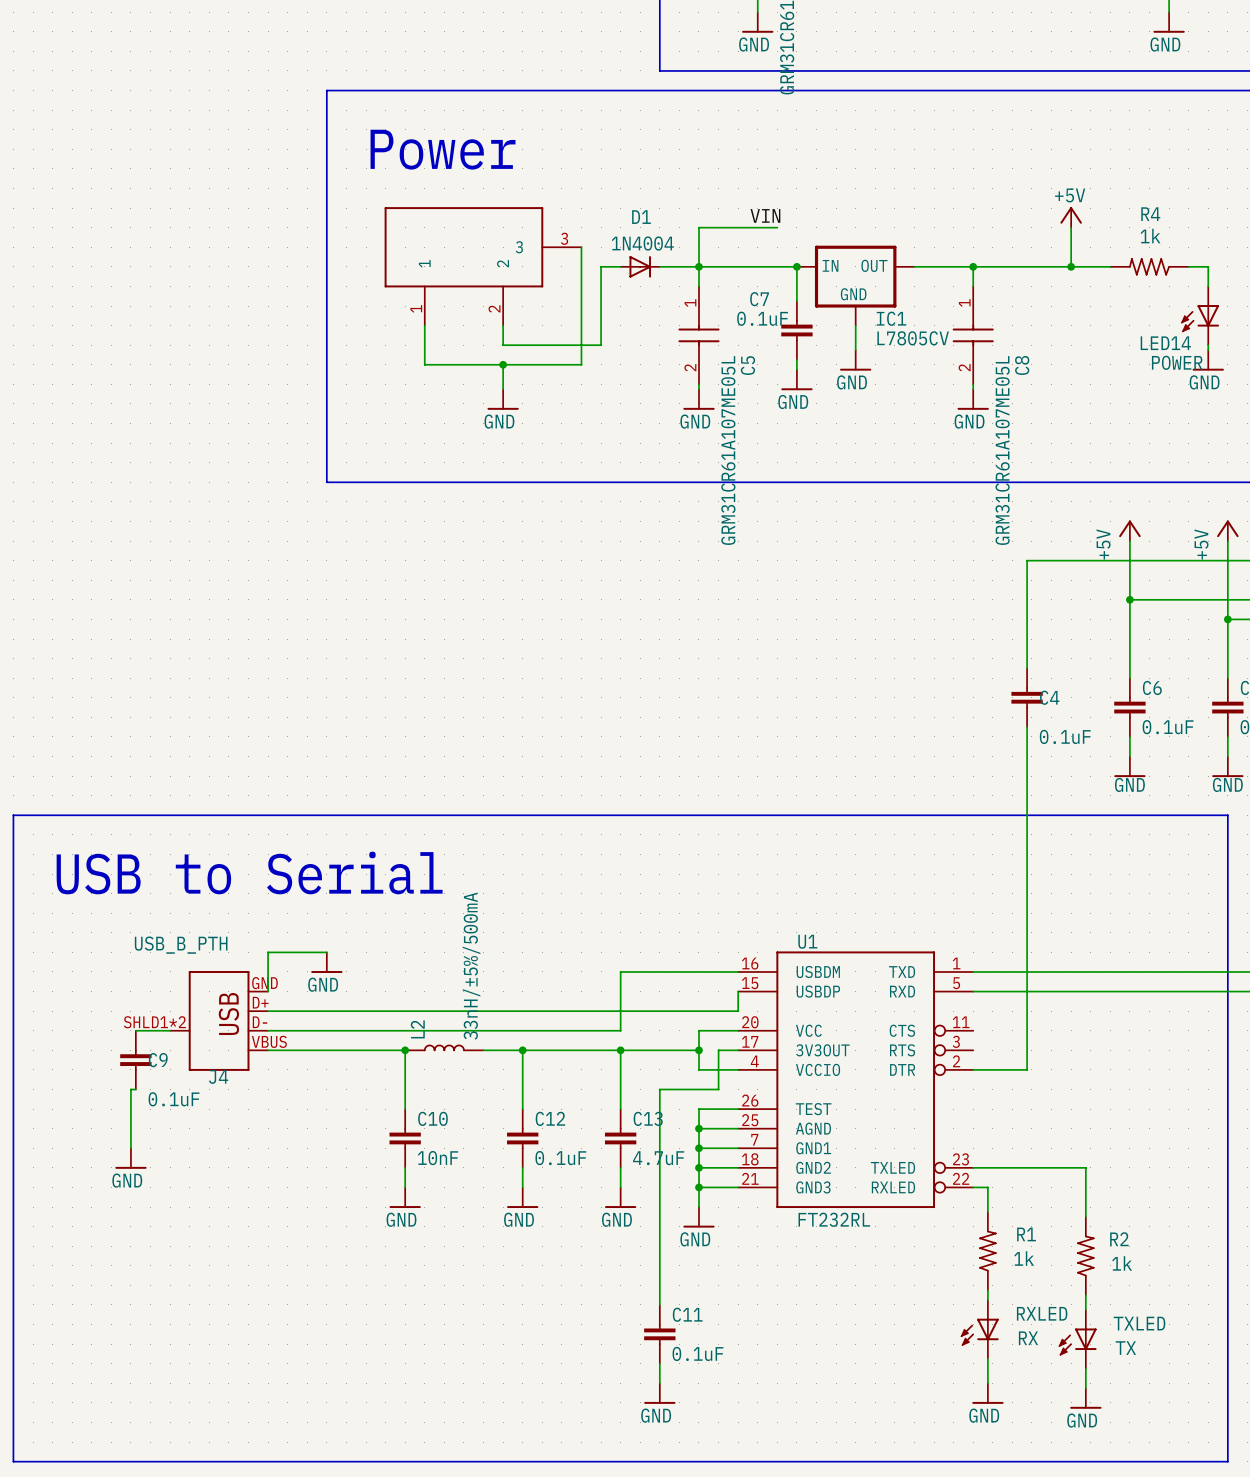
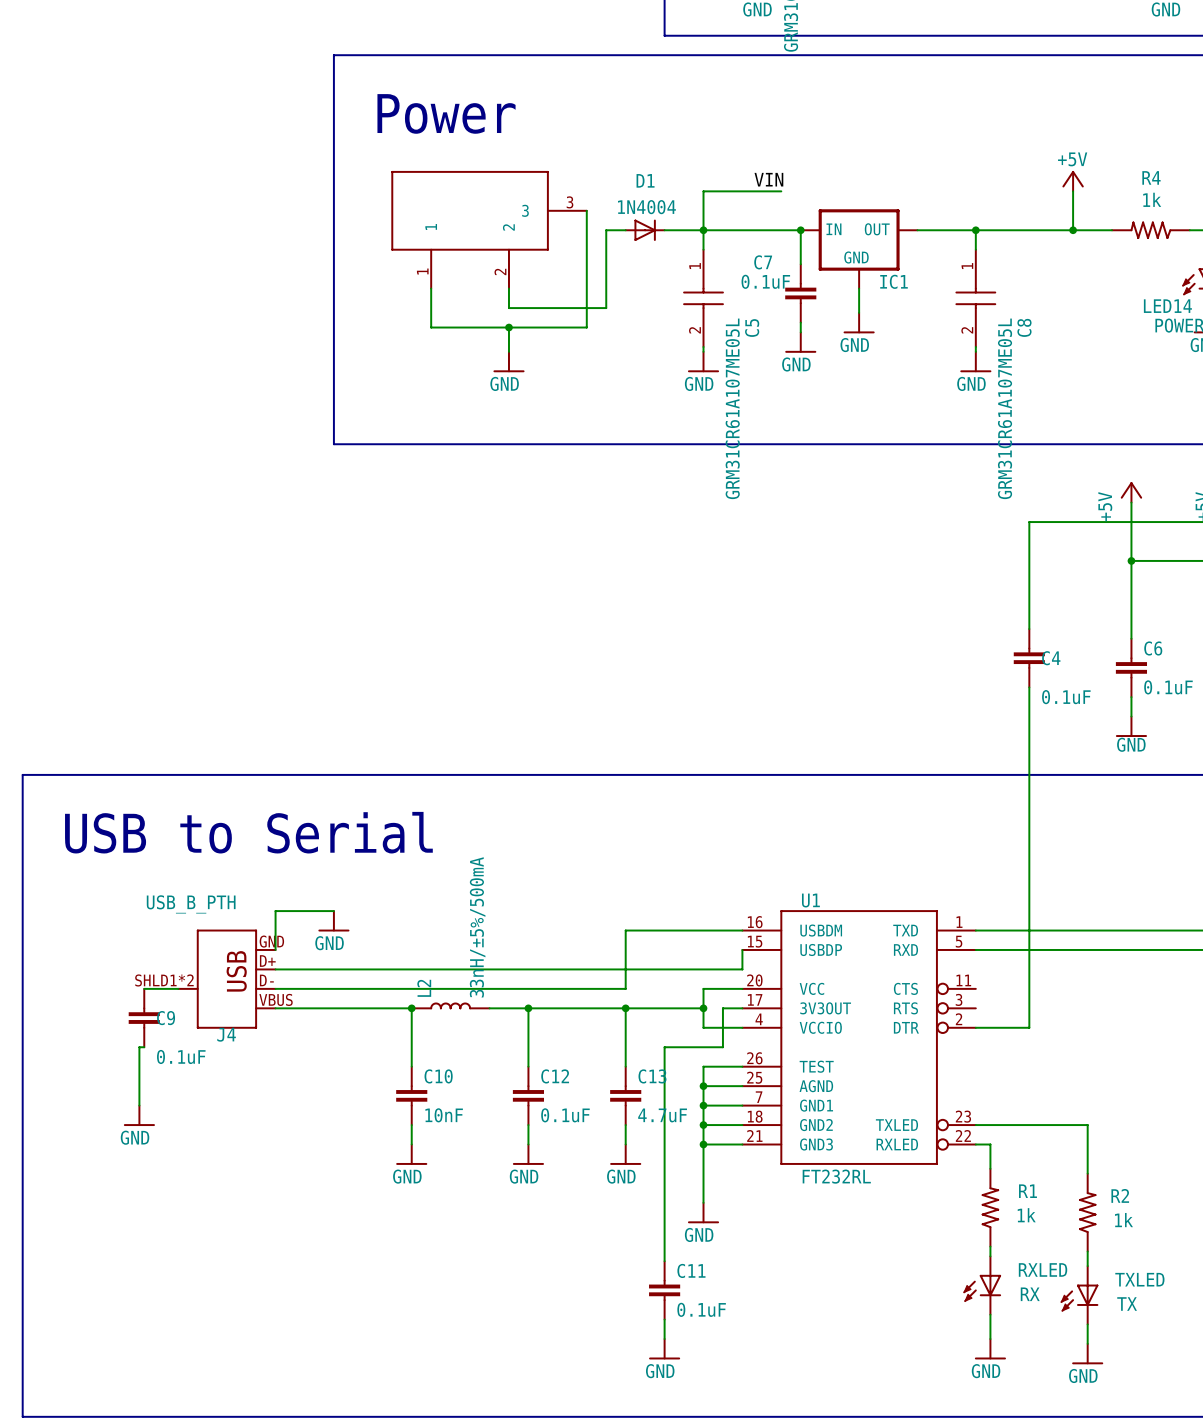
IC1 value: L7805CV (913, 338) -> none
power symbol position: GND (698, 1217) -> GND (703, 1213)

